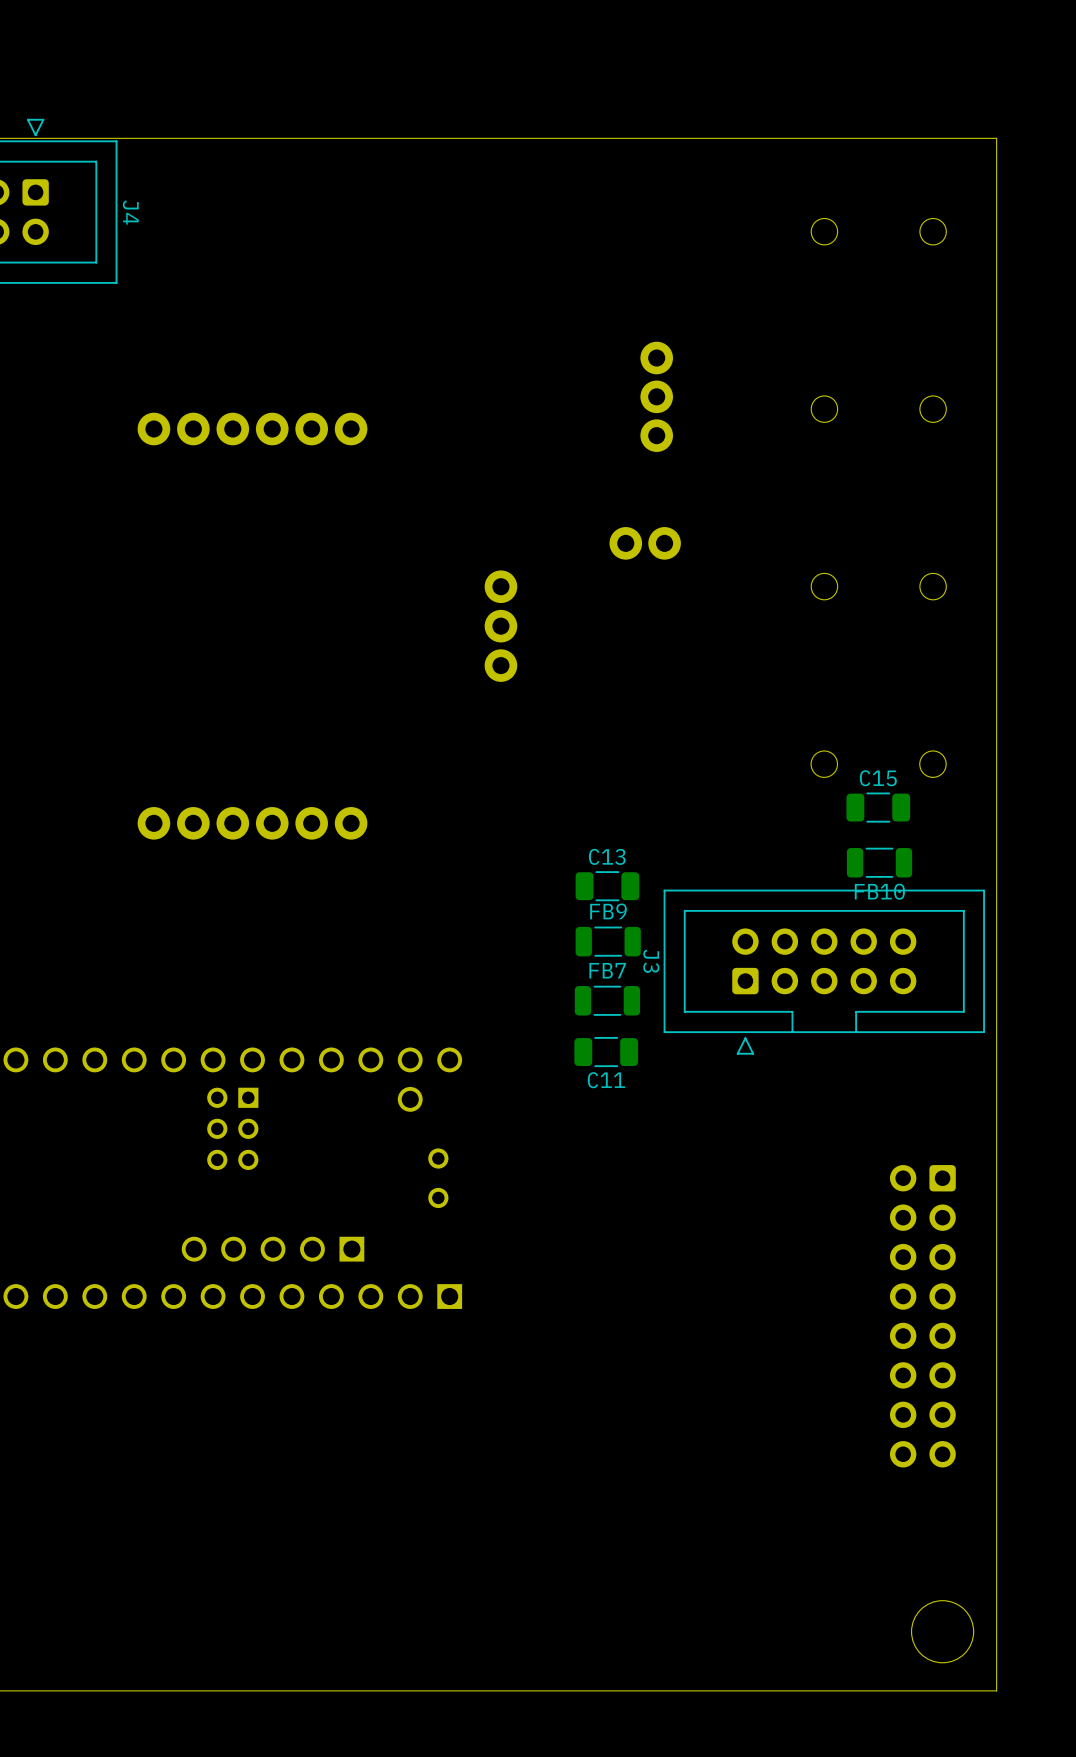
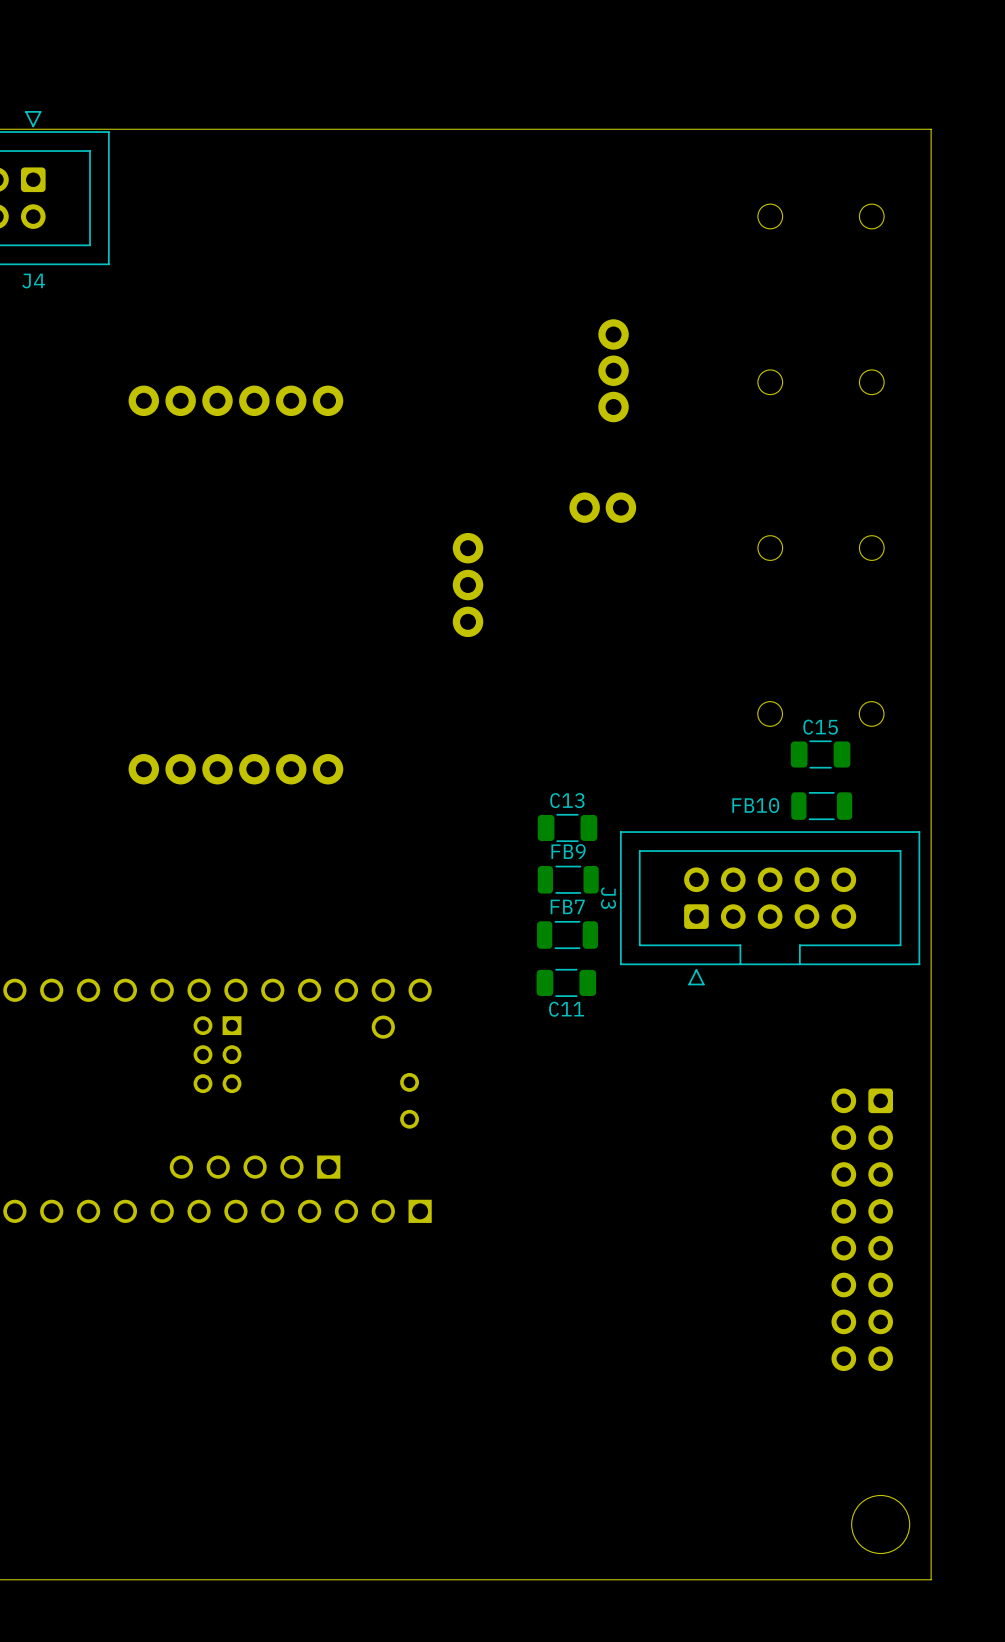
J4 name rotation: 0° (130, 212) -> 90° counterclockwise (33, 281)
J4 name position: J4 (130, 212) -> J4 (33, 281)
FB10 name position: FB10 (879, 891) -> FB10 (755, 805)

